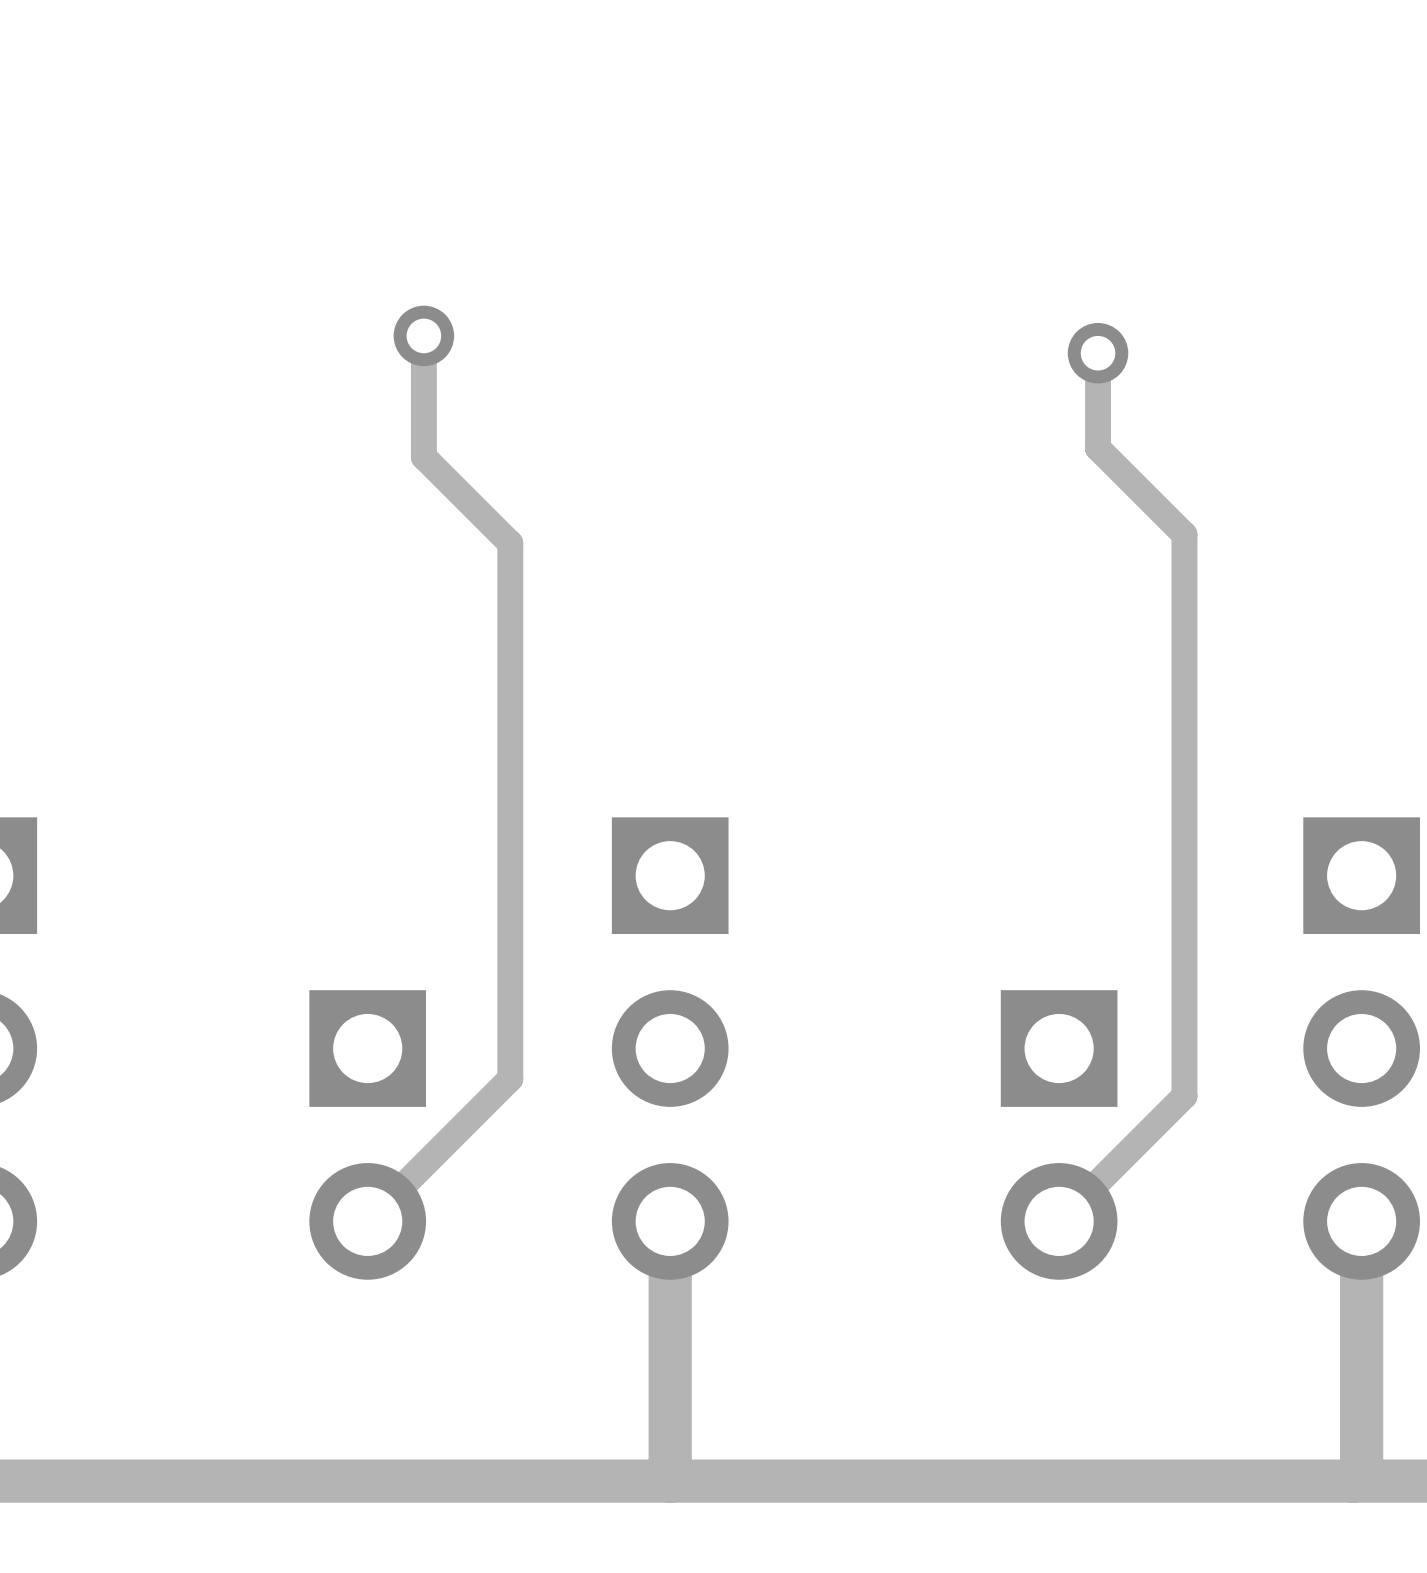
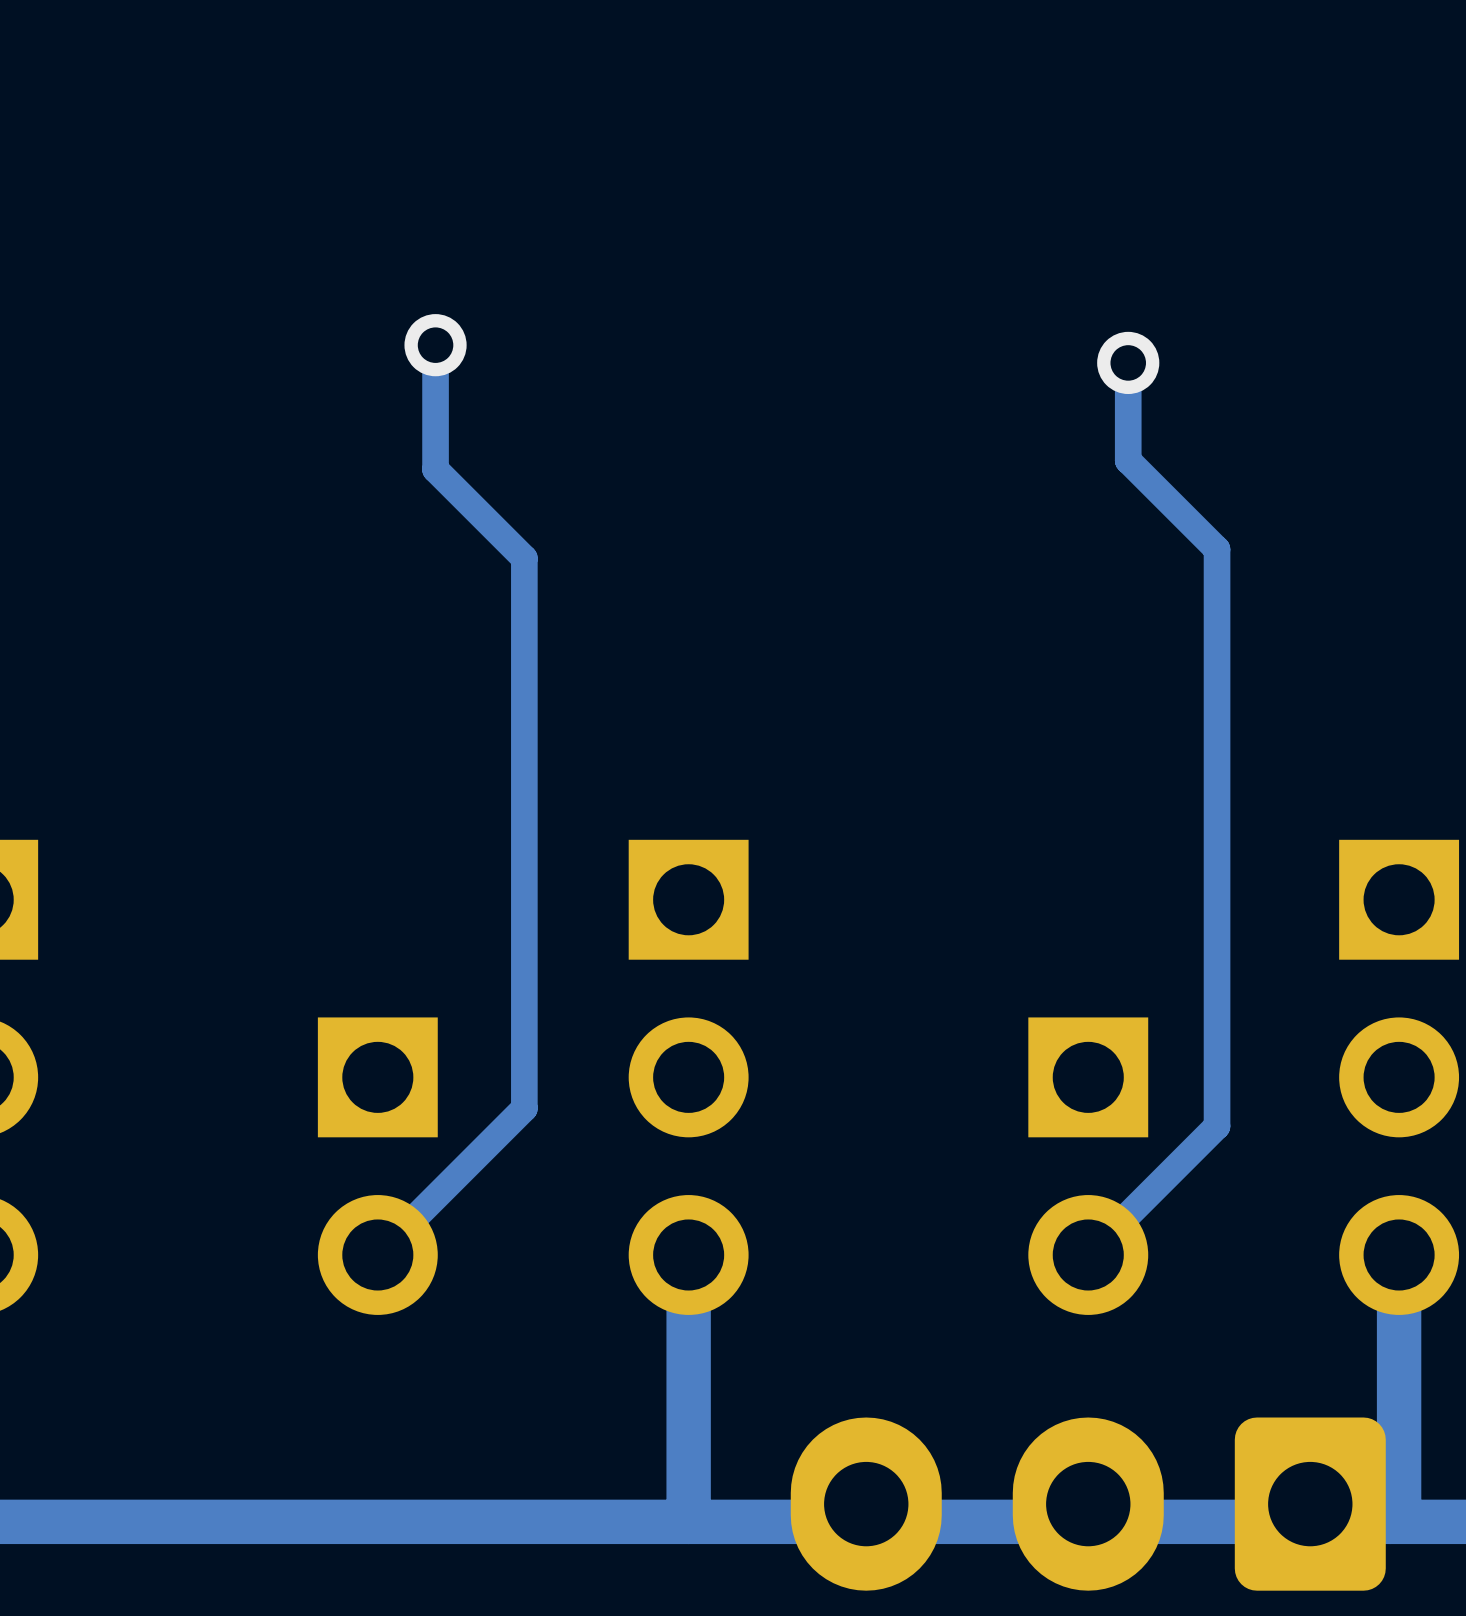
part: none -> (1088, 1504)

